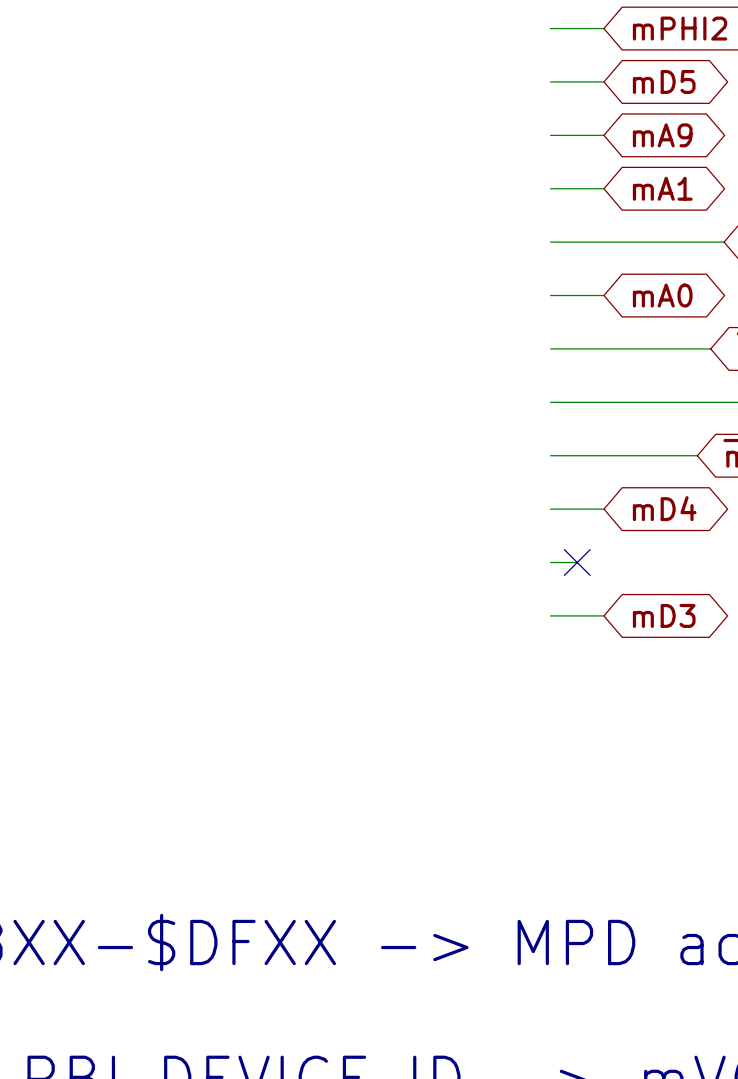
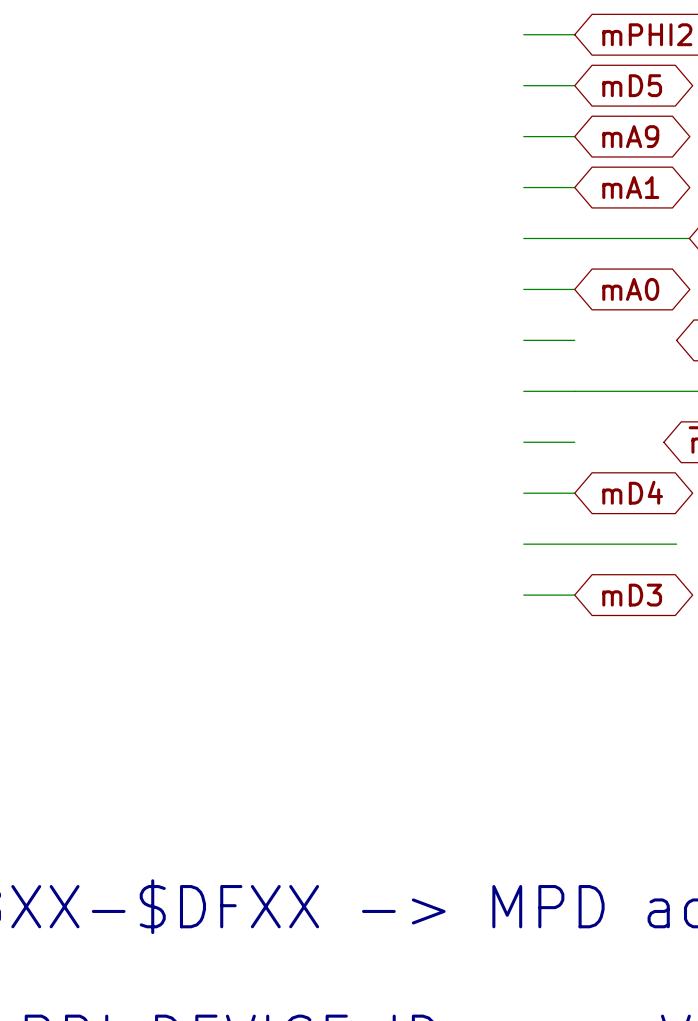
wire: (603, 348) (710, 348) -> none
wire: (603, 455) (697, 455) -> none
wire: none -> (549, 544) (676, 544)
no-connect mark: (577, 562) -> none

